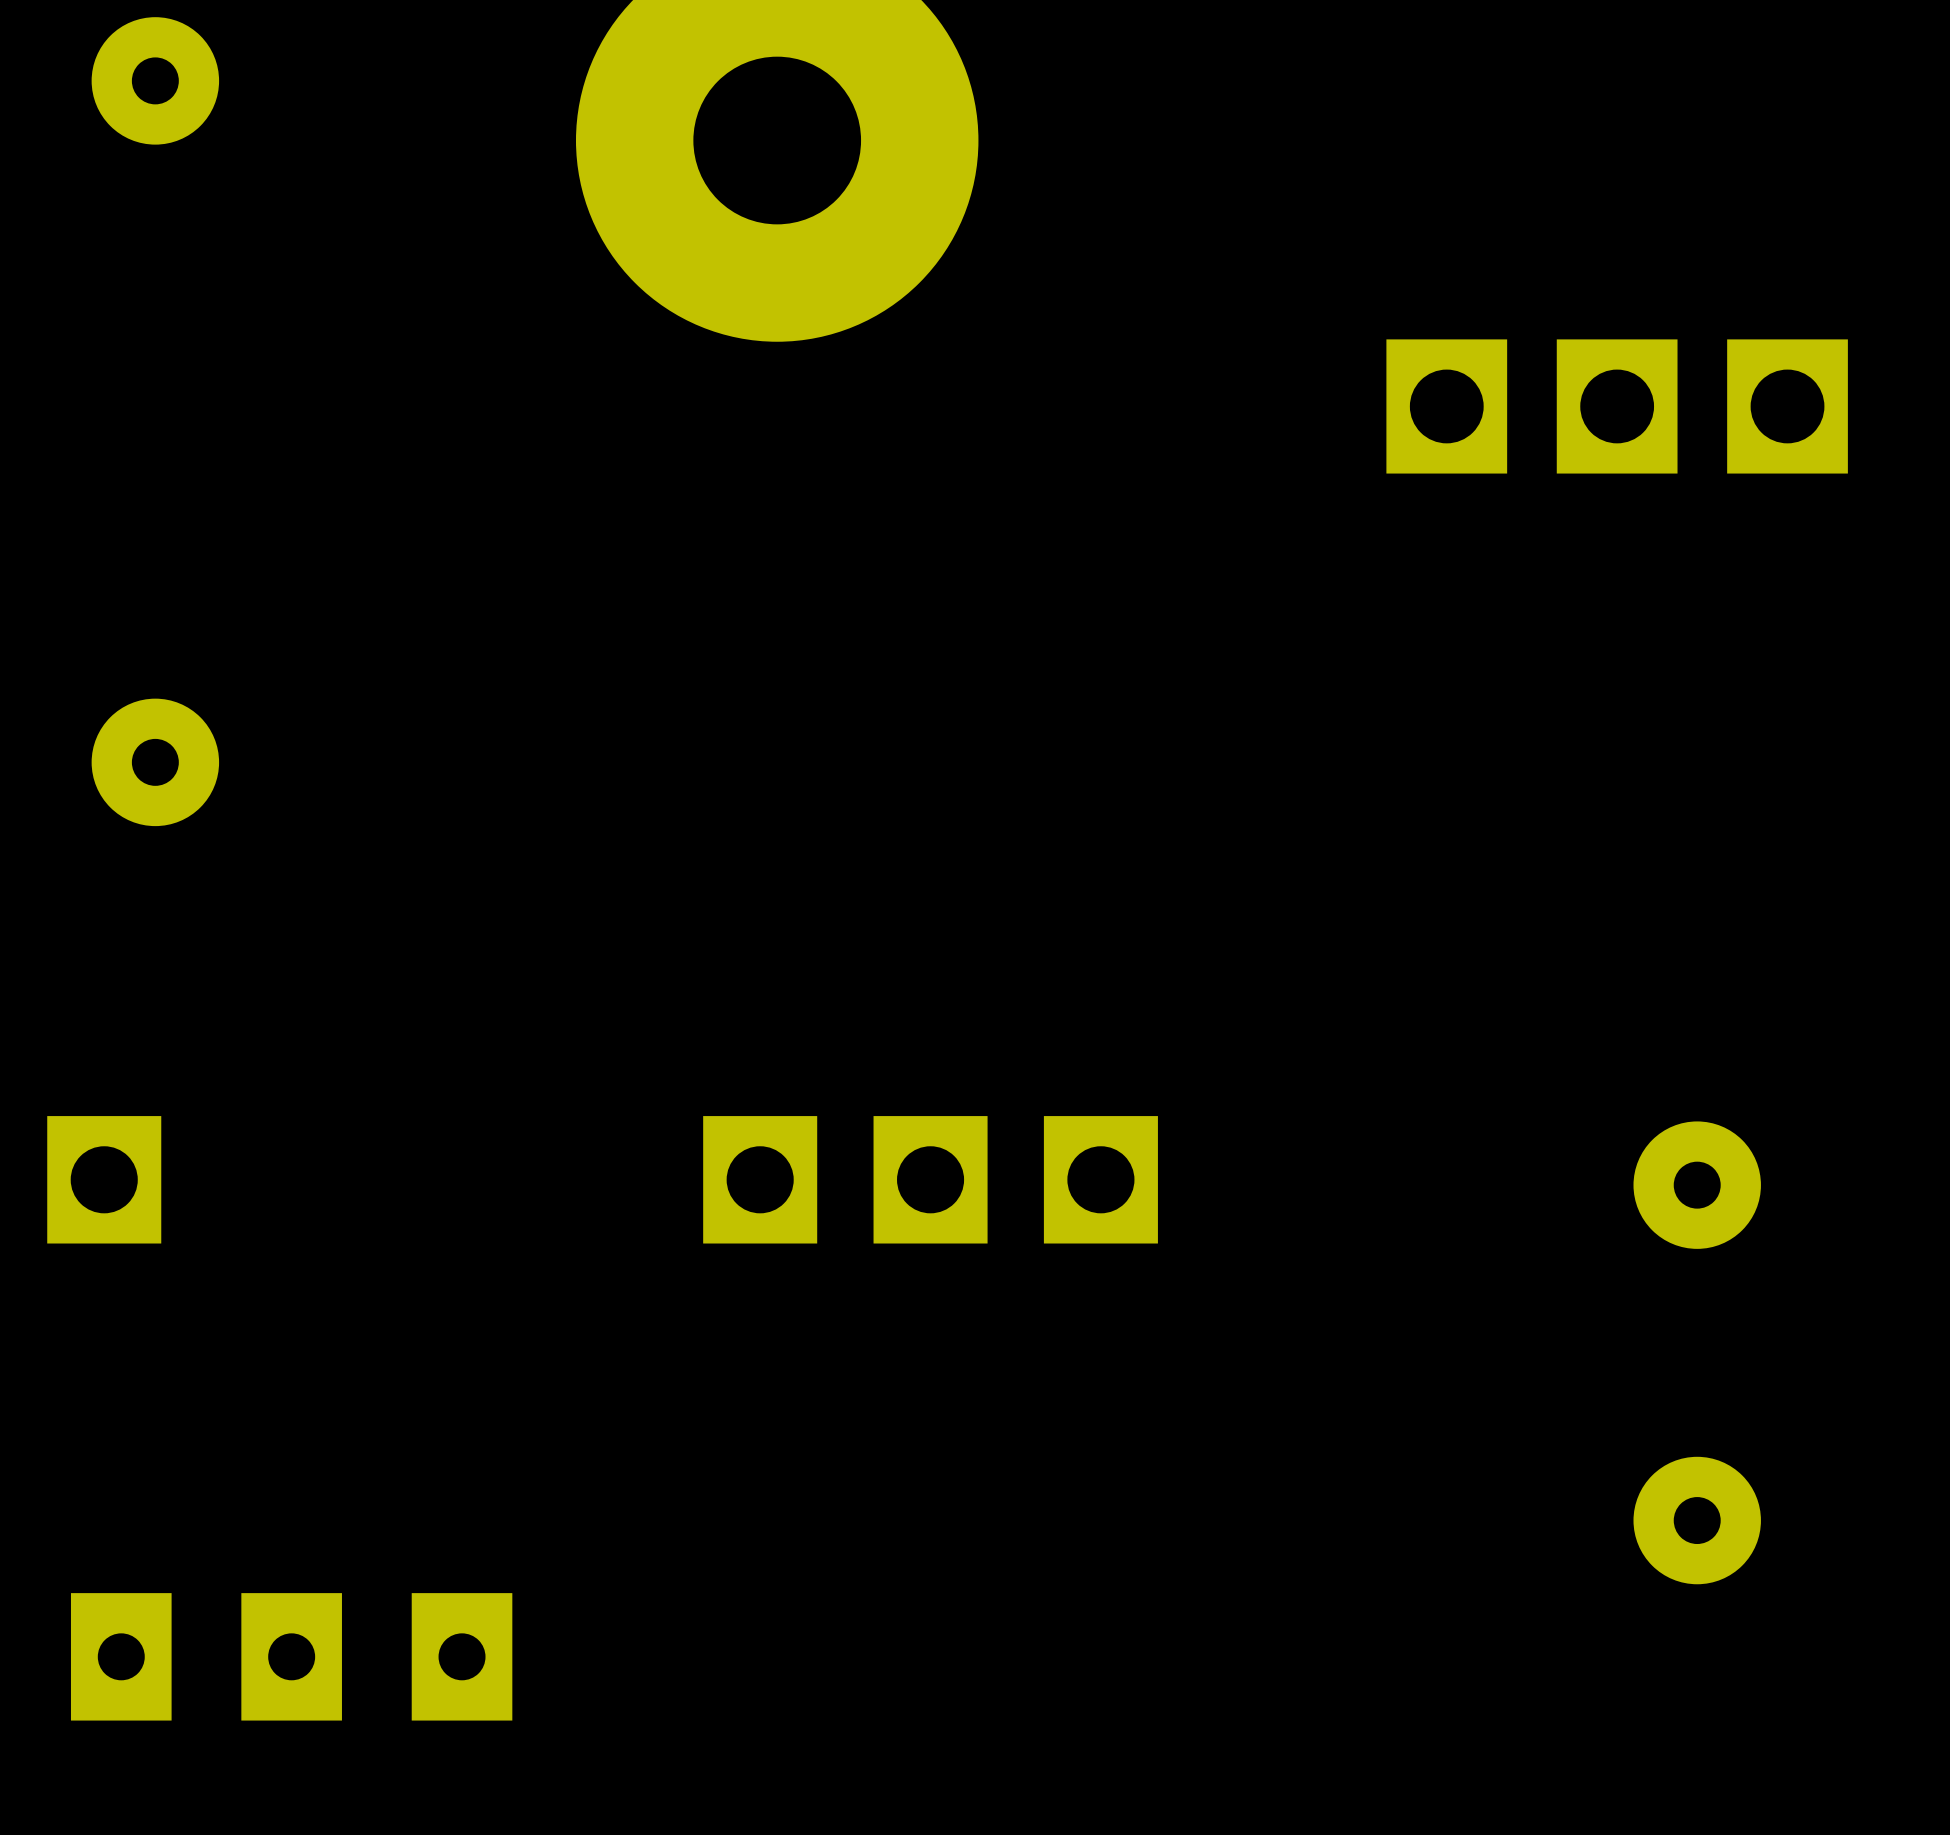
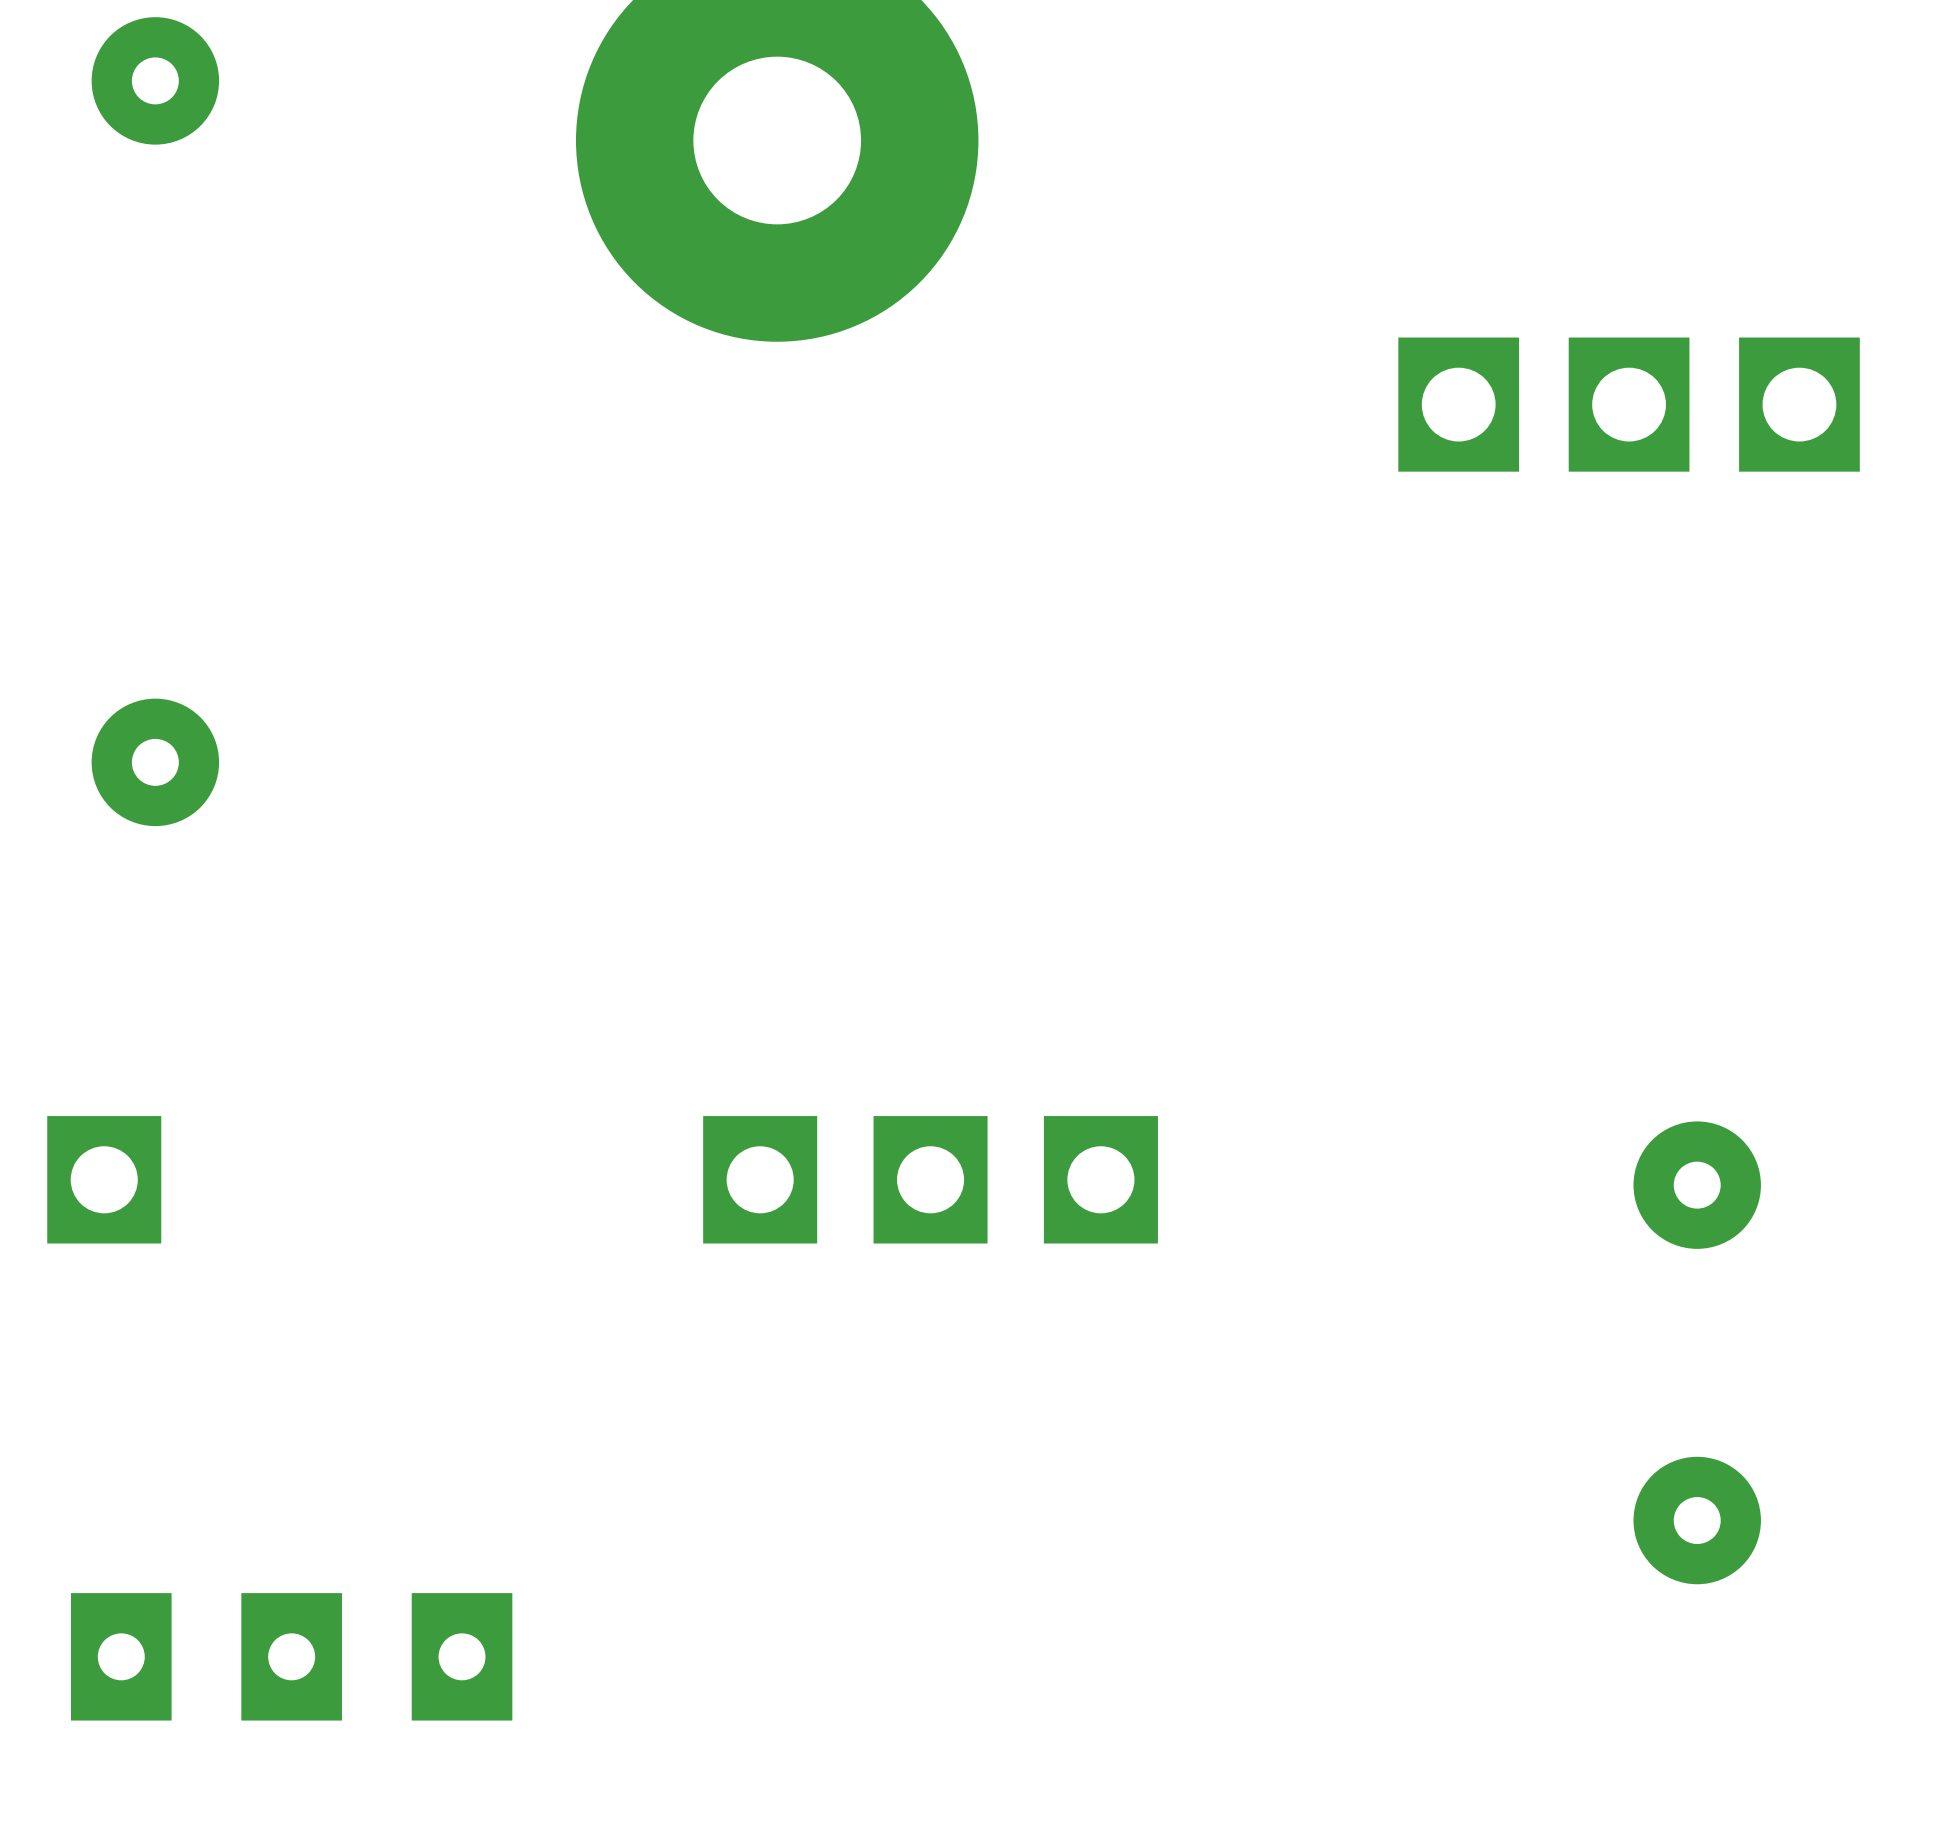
part position: (1617, 406) -> (1629, 404)

